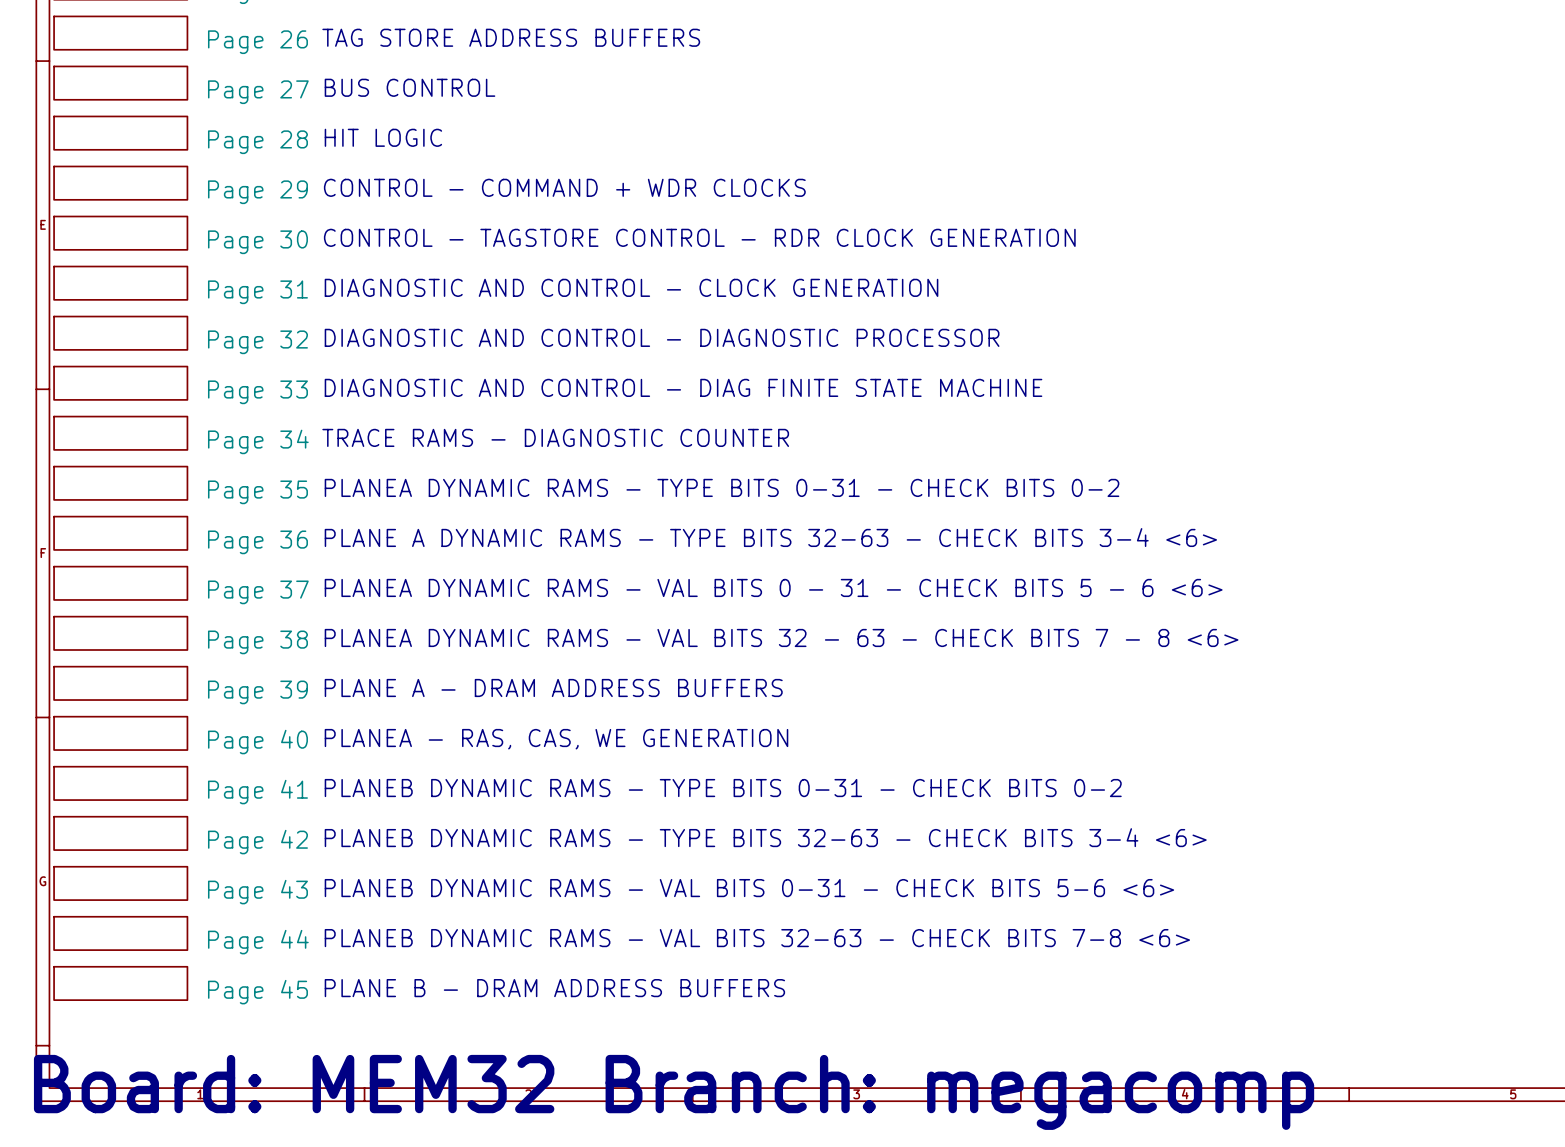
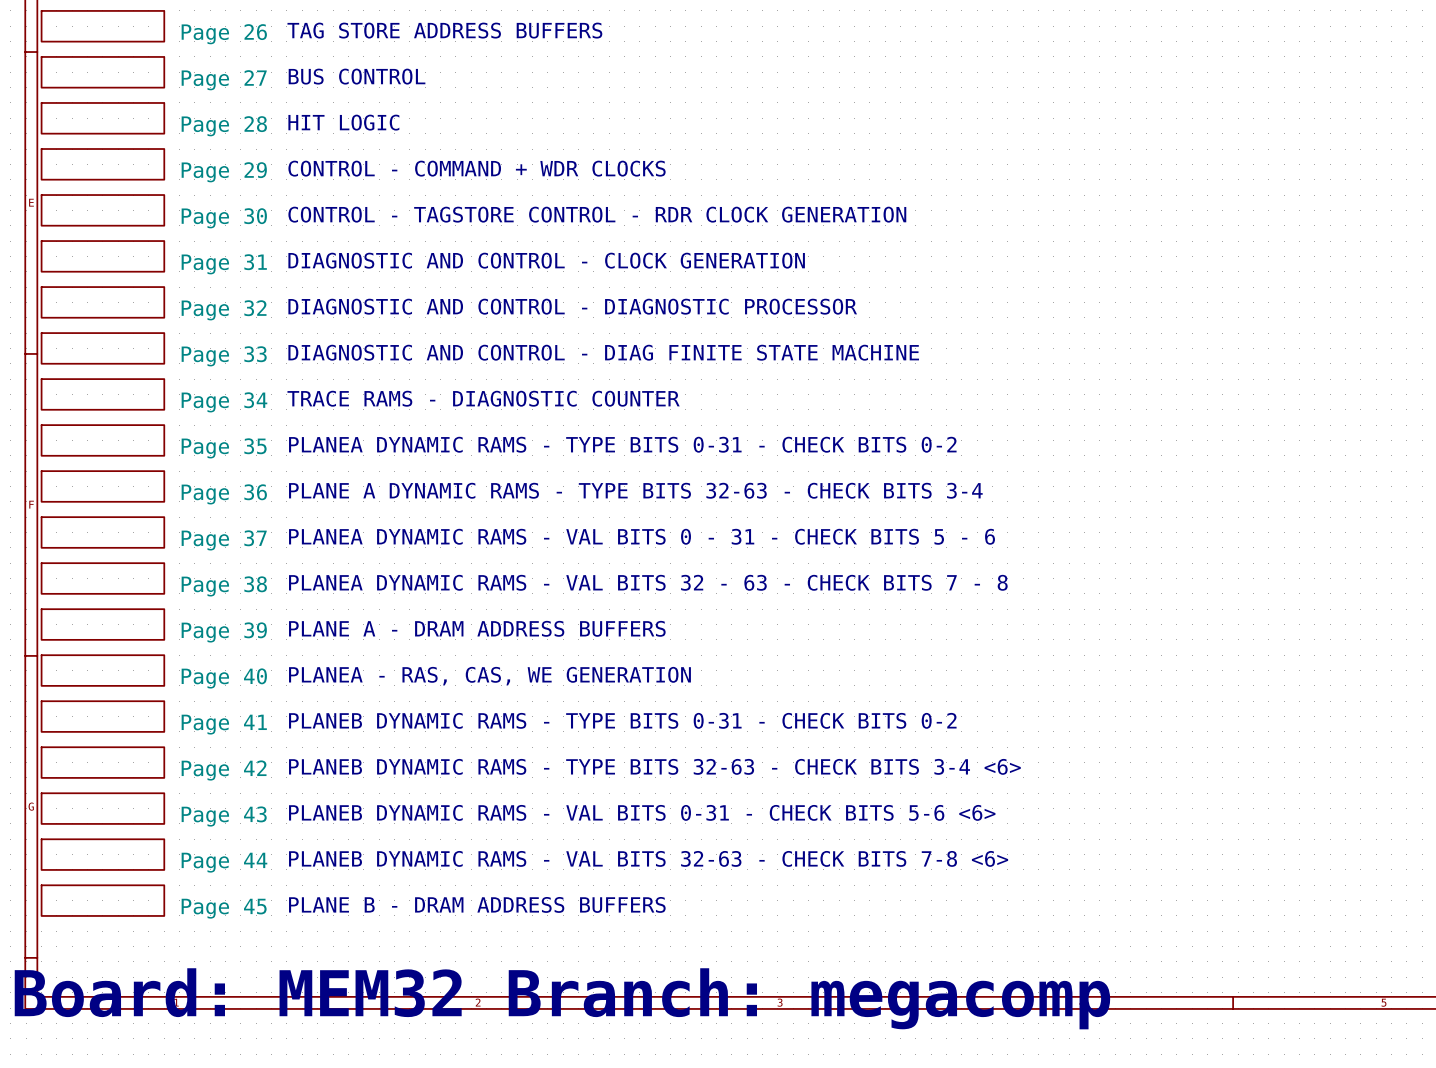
text: PLANE A DYNAMIC RAMS - TYPE BITS 32-63 - CHECK BITS 3-4 <6> (770, 537) -> PLANE A DYNAMIC RAMS - TYPE BITS 32-63 - CHECK BITS 3-4 (635, 490)
text: PLANEA DYNAMIC RAMS - VAL BITS 0 - 31 - CHECK BITS 5 - 6 <6> (773, 587) -> PLANEA DYNAMIC RAMS - VAL BITS 0 - 31 - CHECK BITS 5 - 6 (642, 536)
text: PLANEA DYNAMIC RAMS - VAL BITS 32 - 63 - CHECK BITS 7 - 8 <6> (781, 637) -> PLANEA DYNAMIC RAMS - VAL BITS 32 - 63 - CHECK BITS 7 - 8 (648, 582)

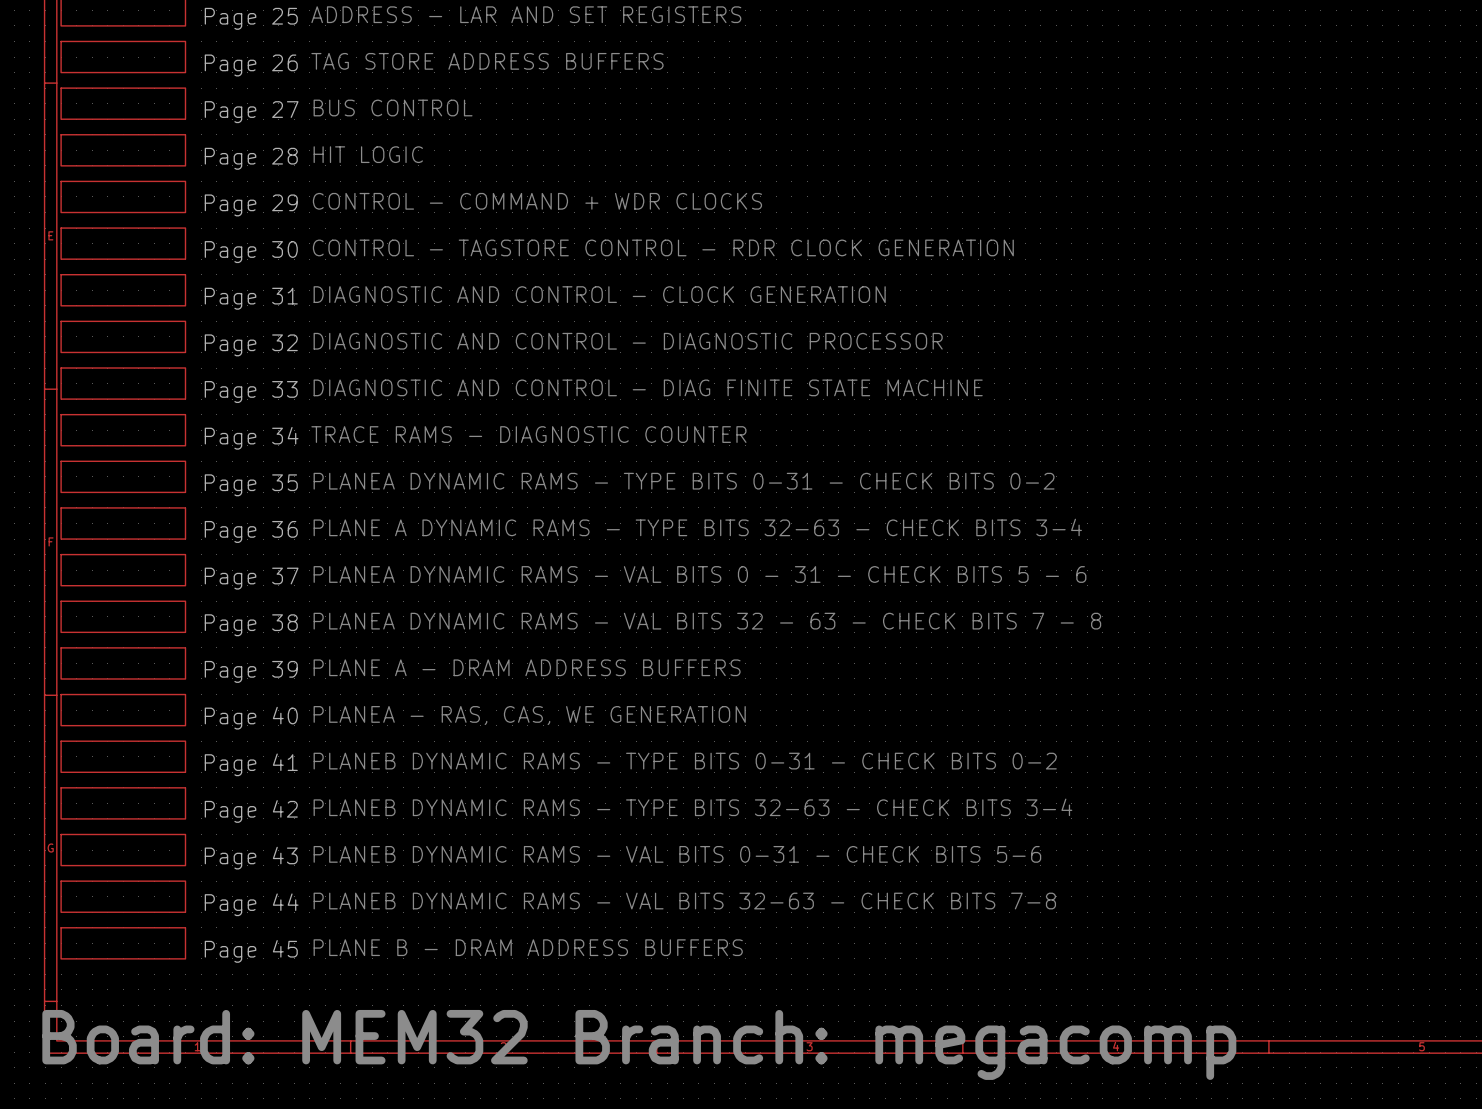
text: PLANEB DYNAMIC RAMS - TYPE BITS 32-63 - CHECK BITS 3-4 <6> (654, 766) -> PLANEB DYNAMIC RAMS - TYPE BITS 32-63 - CHECK BITS 3-4 (692, 807)
text: PLANEB DYNAMIC RAMS - VAL BITS 0-31 - CHECK BITS 5-6 <6> (642, 812) -> PLANEB DYNAMIC RAMS - VAL BITS 0-31 - CHECK BITS 5-6 (677, 854)
text: PLANEB DYNAMIC RAMS - VAL BITS 32-63 - CHECK BITS 7-8 <6> (648, 858) -> PLANEB DYNAMIC RAMS - VAL BITS 32-63 - CHECK BITS 7-8 (684, 901)

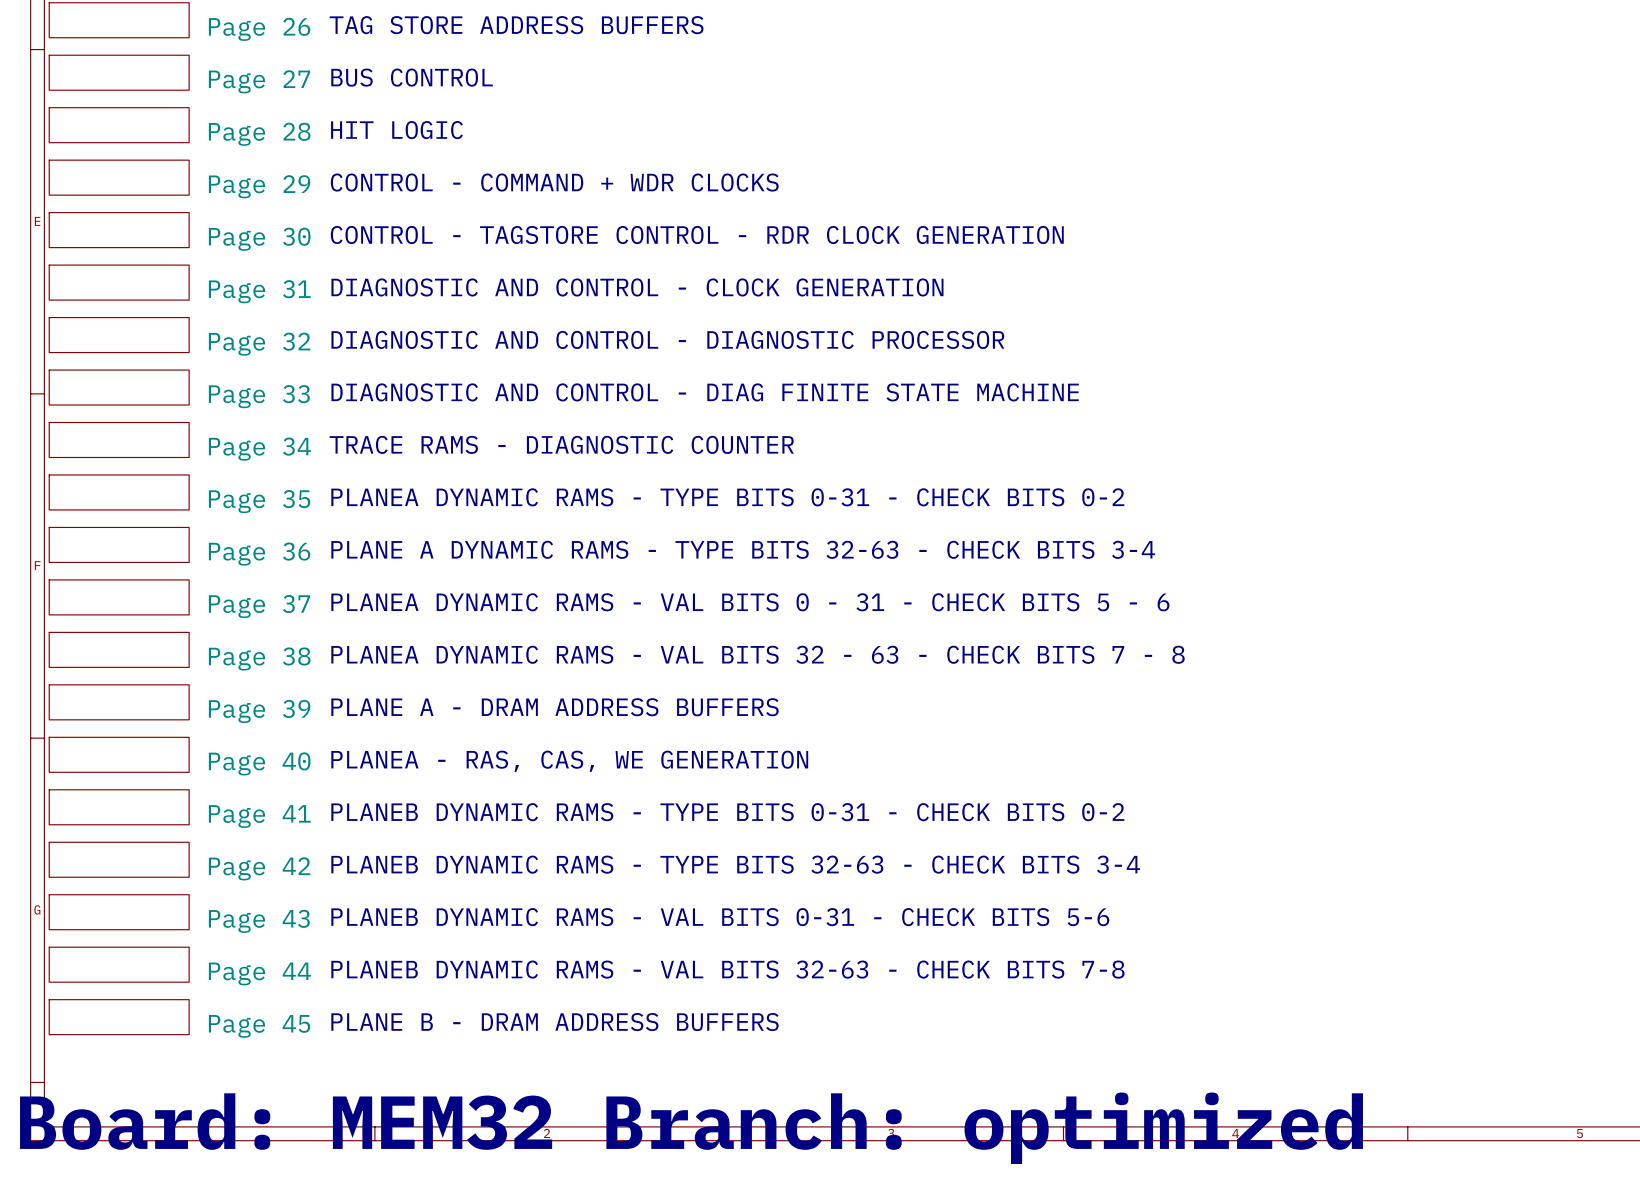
text: Board: MEM32 Branch: megacomp (639, 1044) -> Board: MEM32 Branch: optimized (691, 1128)

